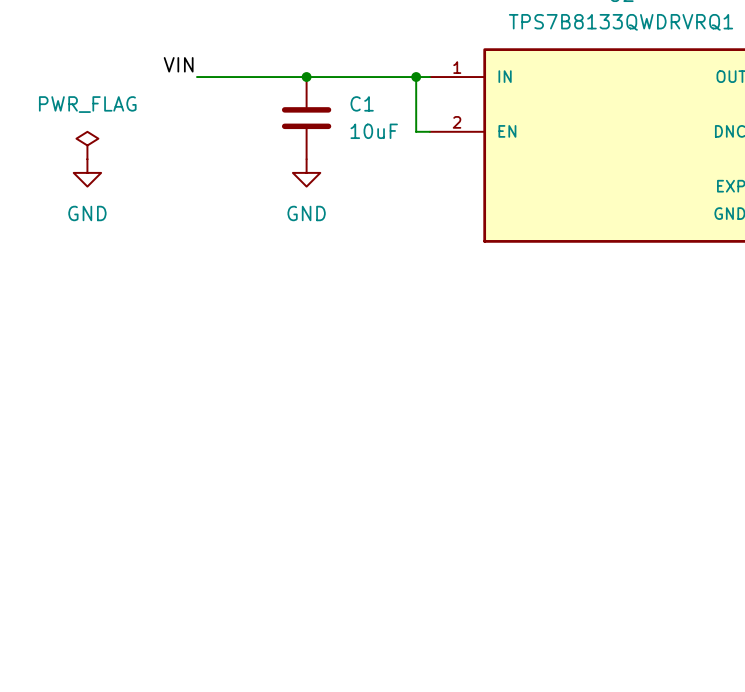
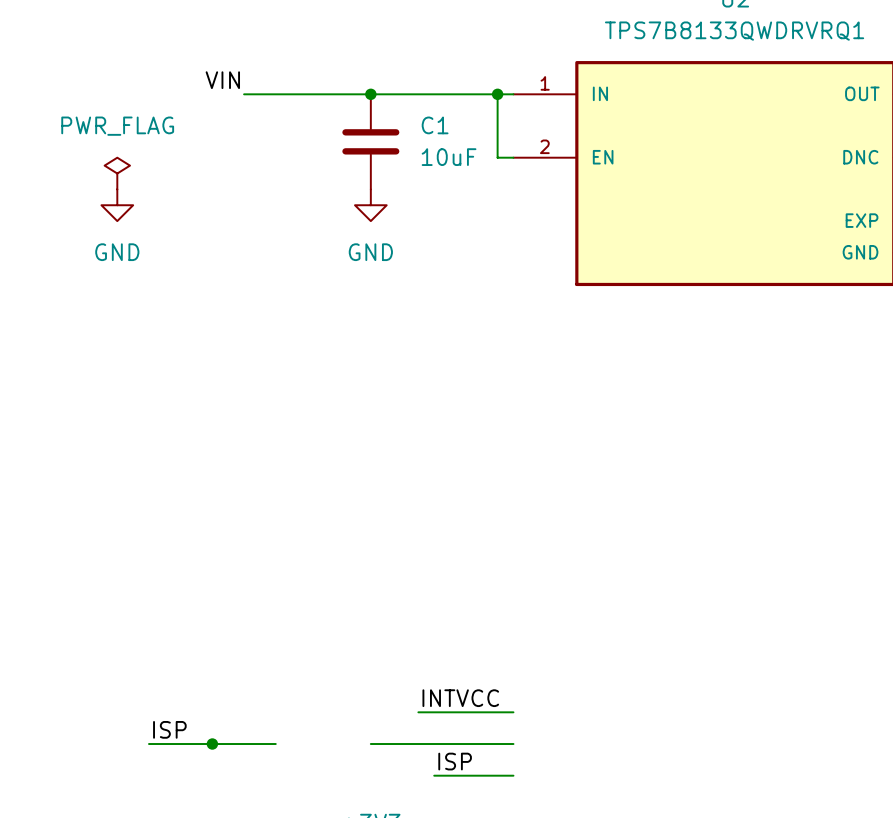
label: none -> INTVCC (460, 698)
wire: none -> (418, 712) (513, 712)
label: none -> ISP (169, 729)
wire: none -> (149, 744) (275, 744)
junction: none -> (212, 744)
wire: none -> (370, 744) (513, 744)
label: none -> ISP (455, 761)
wire: none -> (434, 775) (513, 775)

